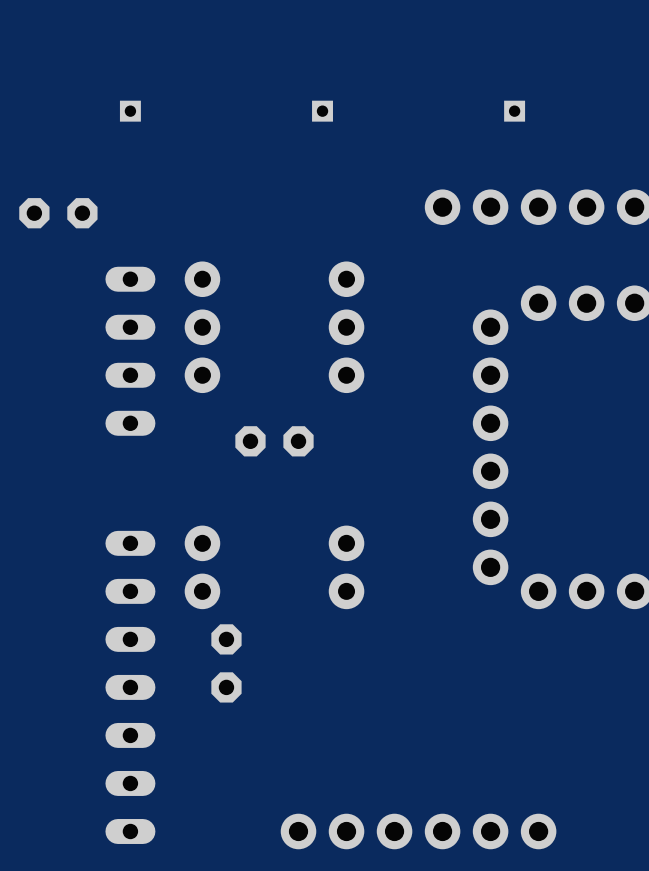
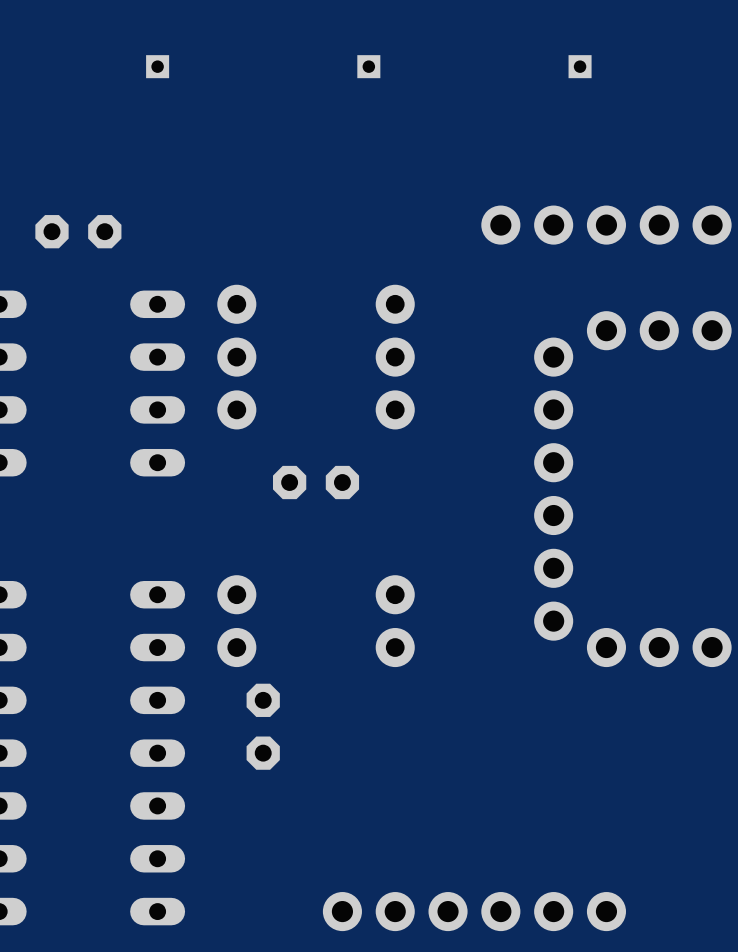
part position: (130, 111) -> (157, 66)
part position: (322, 111) -> (368, 66)
part position: (514, 111) -> (580, 66)

